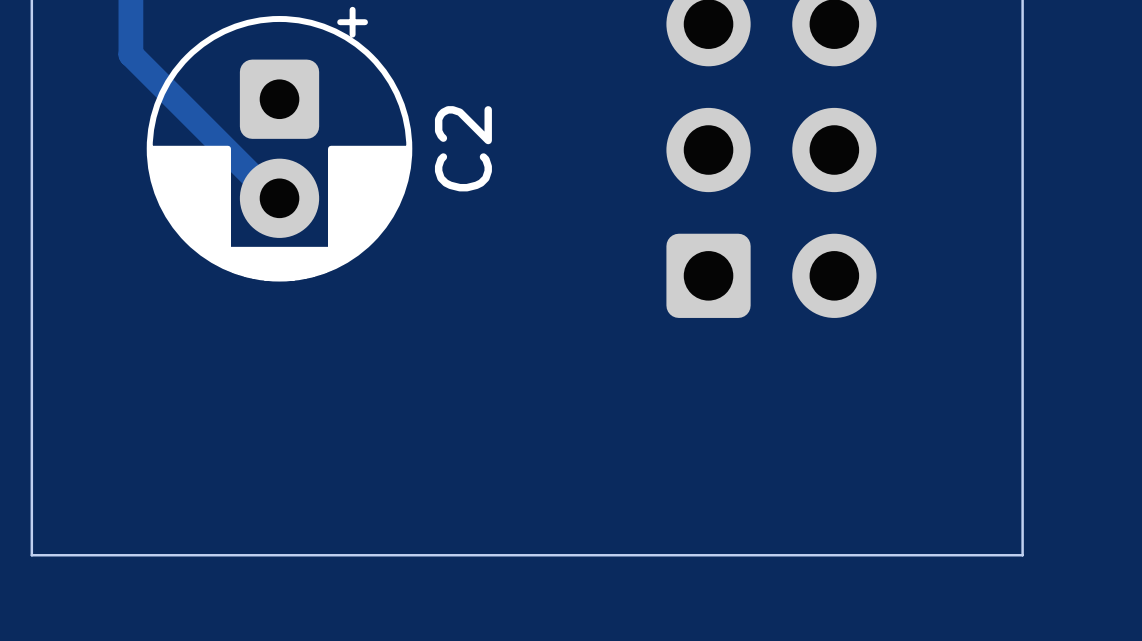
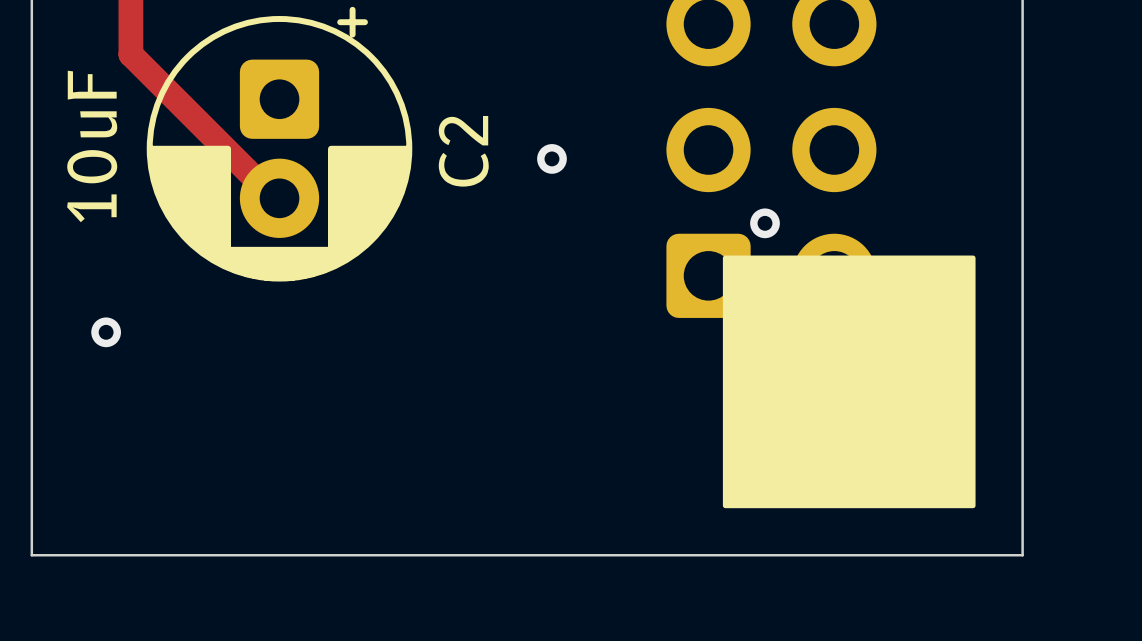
C2 value: none -> 10uF (92, 146)
via: none -> (551, 158)
via: none -> (765, 223)
drawing: none -> [722, 255, 976, 509]
via: none -> (106, 332)

